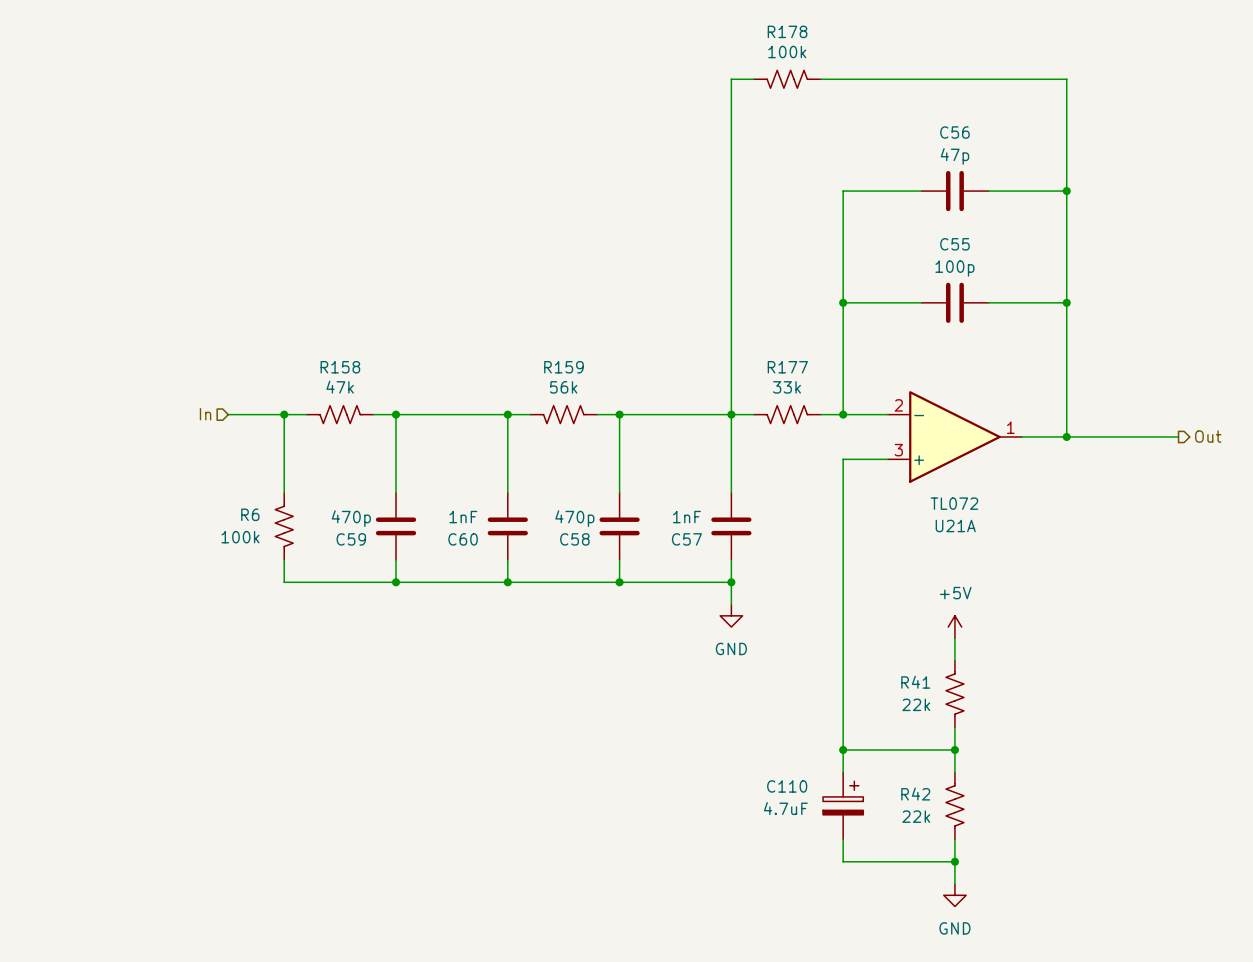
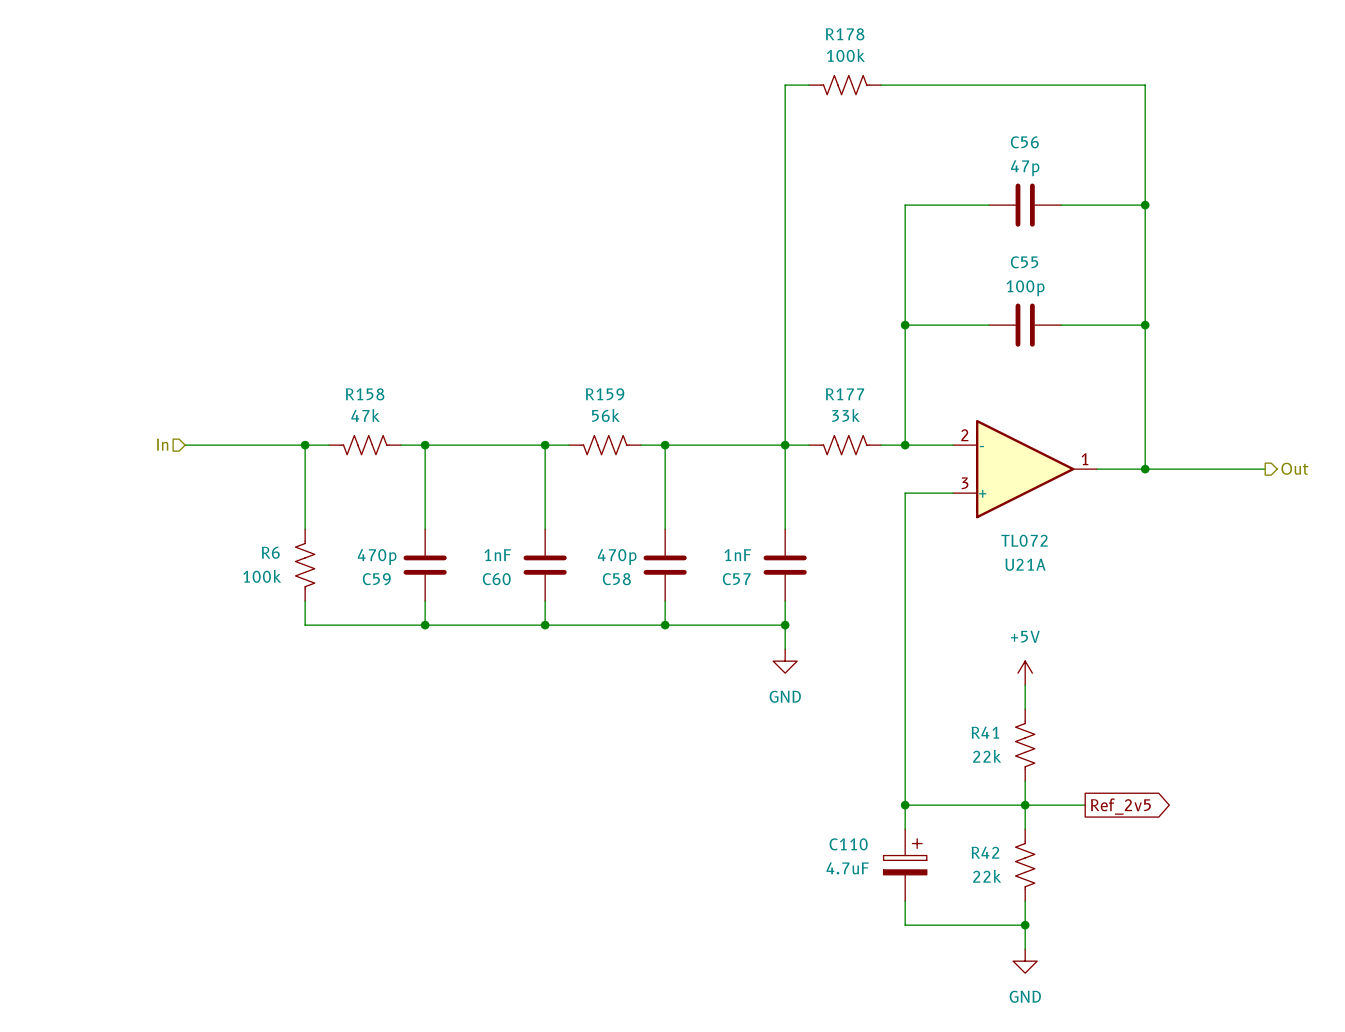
wire: none -> (185, 445) (245, 445)
hierarchical label position: In (205, 414) -> In (162, 444)
wire: none -> (1025, 805) (1085, 805)
global label: none -> Ref_2v5 (1120, 806)

